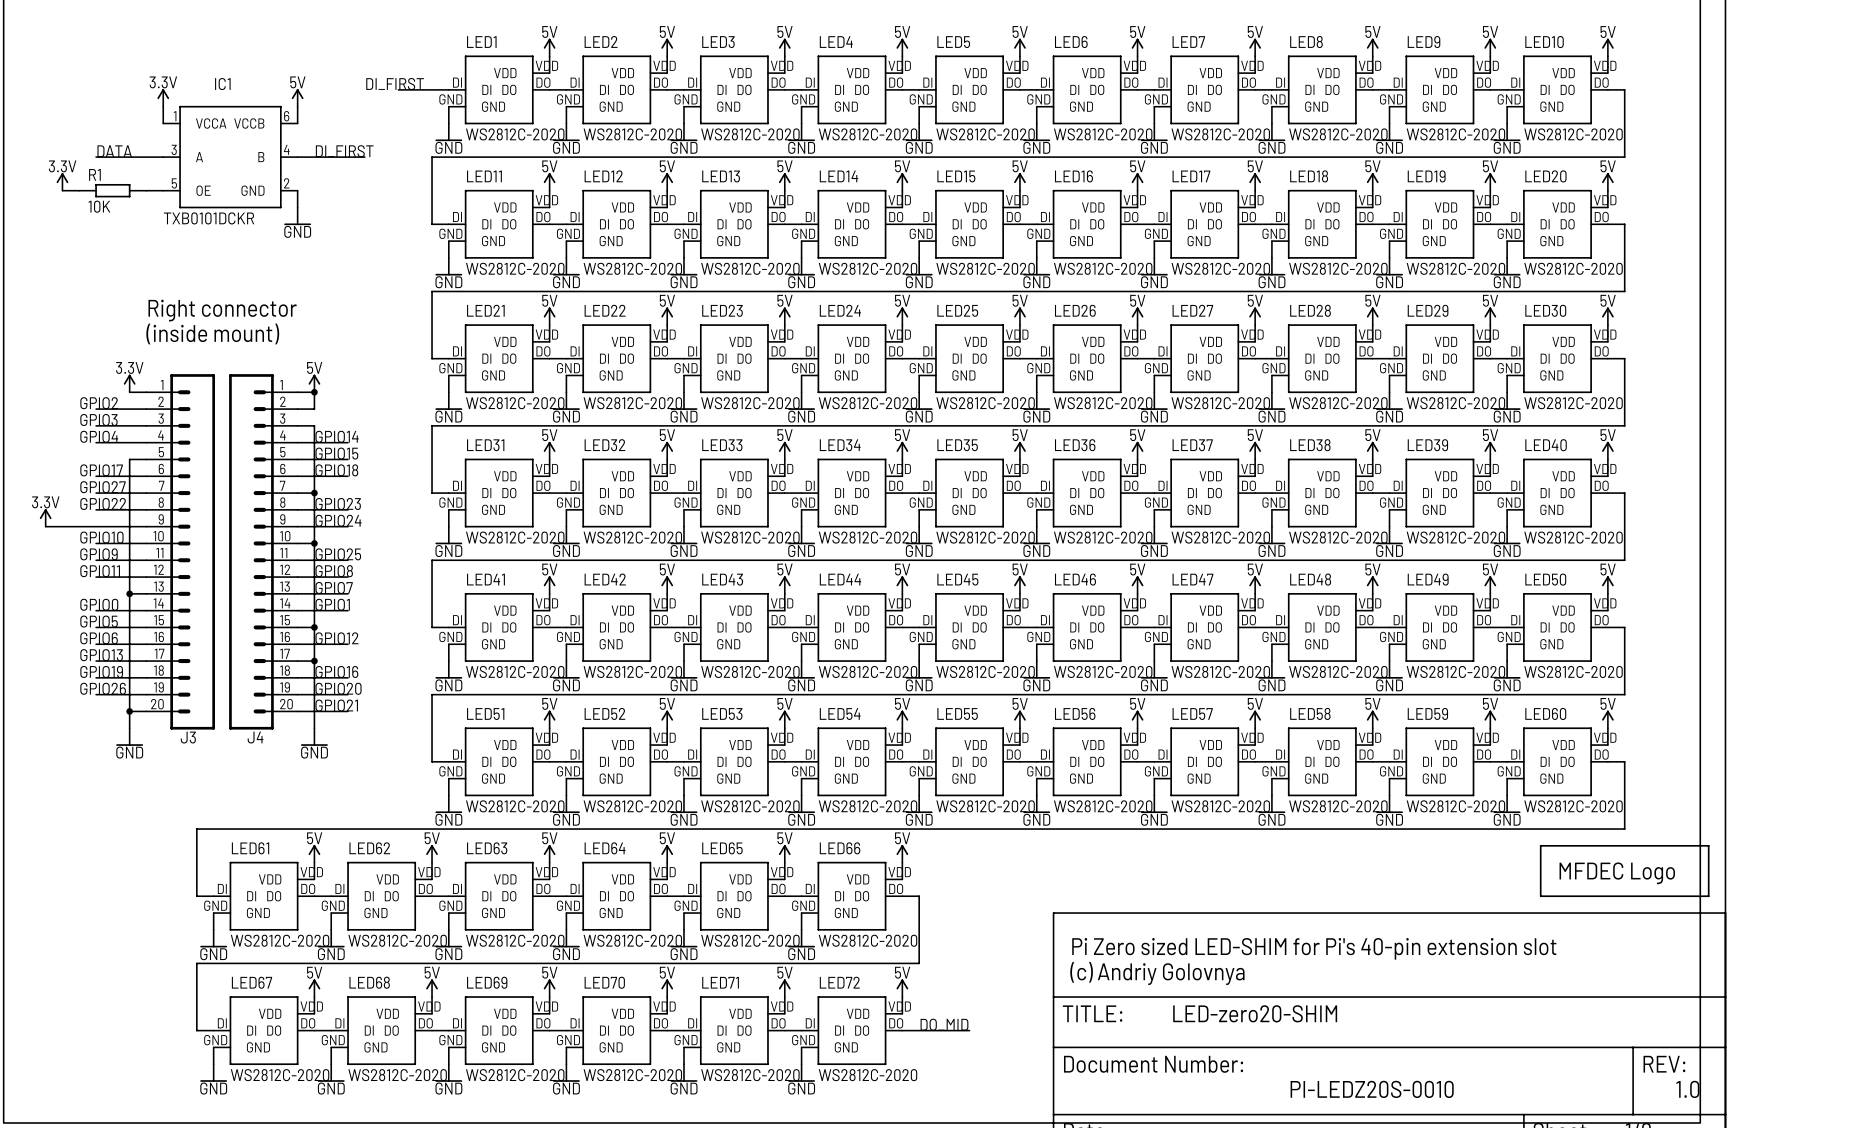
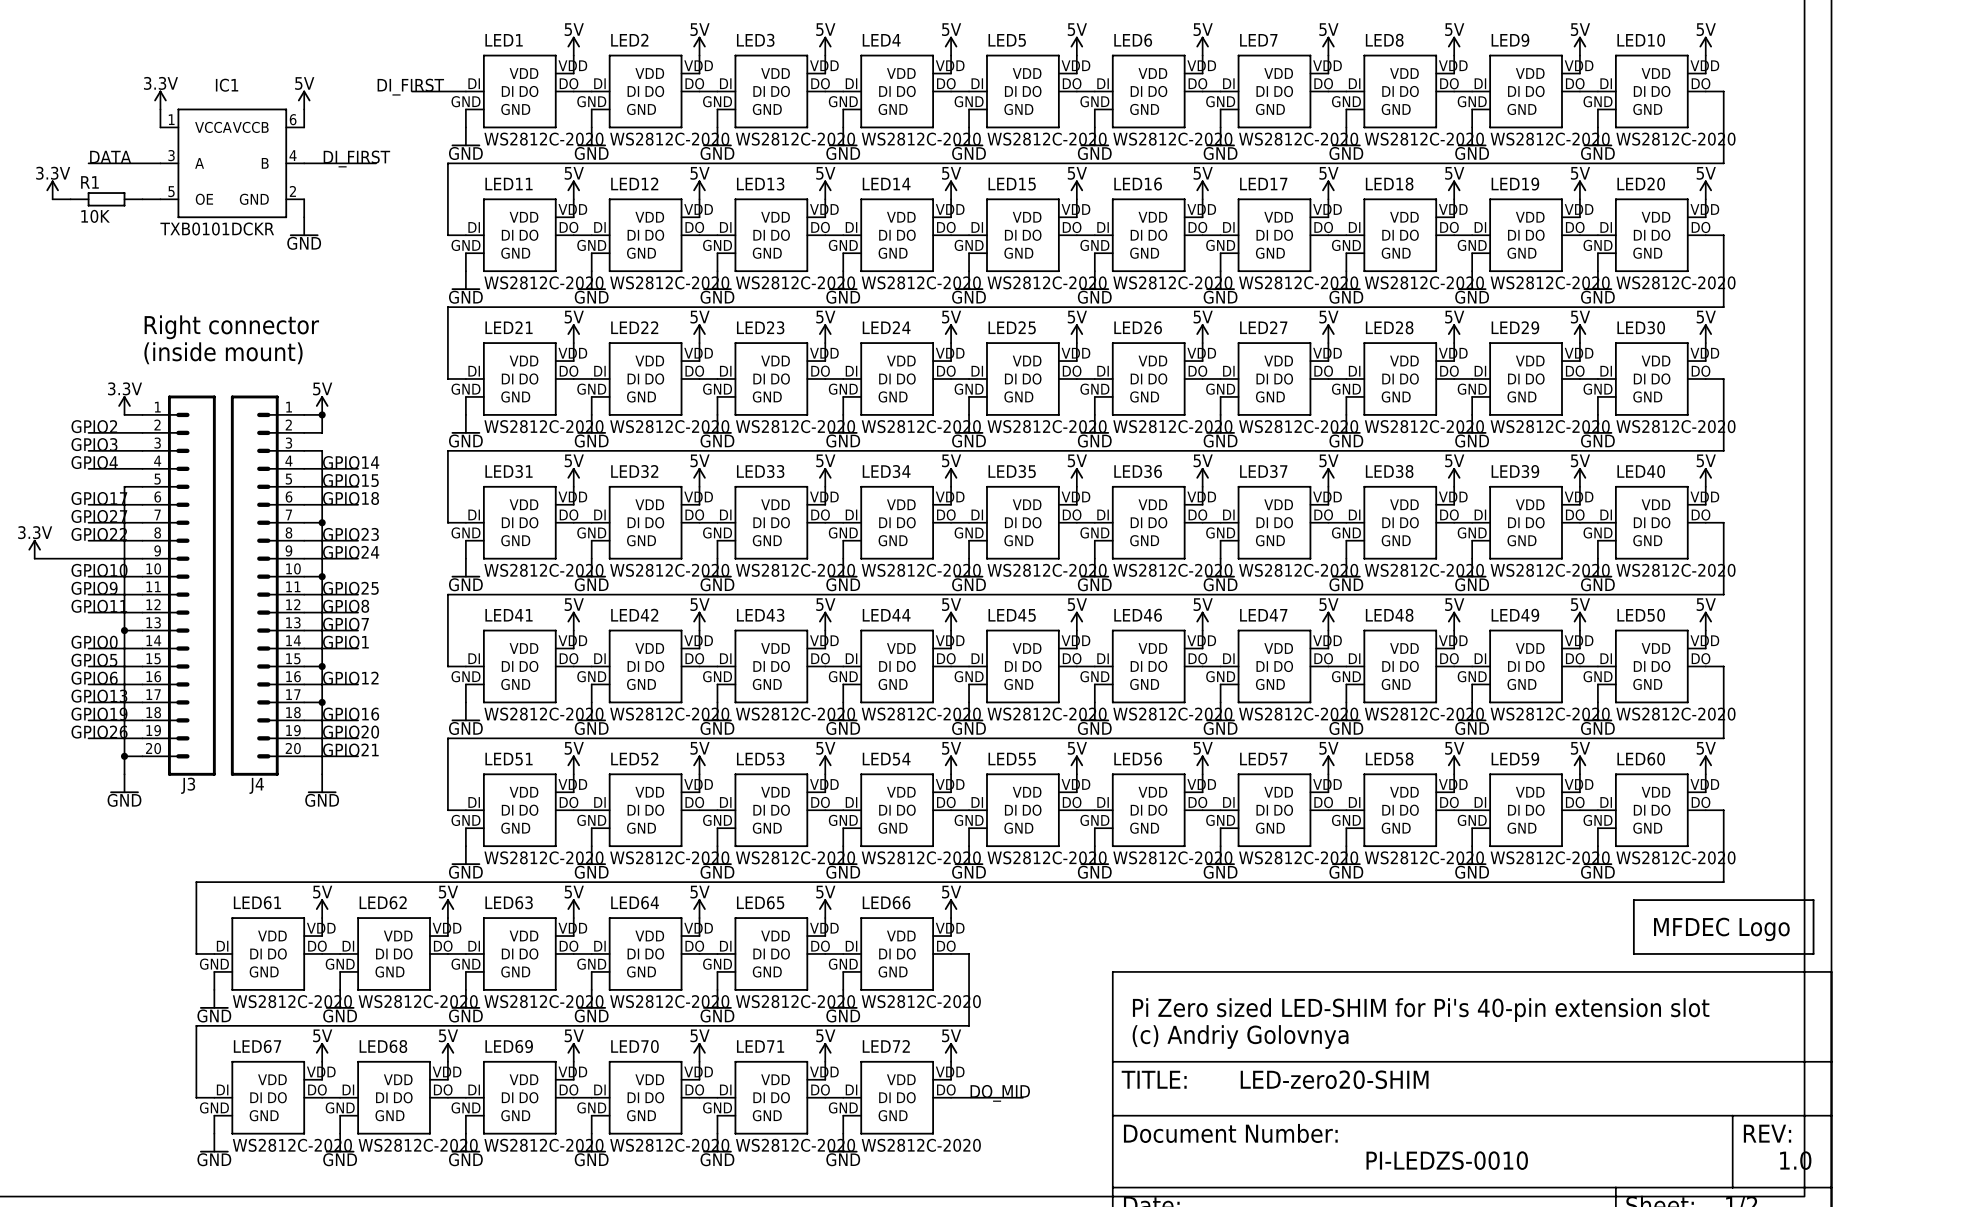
text: PI-LEDZ20S-0010 (1372, 1089) -> PI-LEDZS-0010 (1447, 1160)

